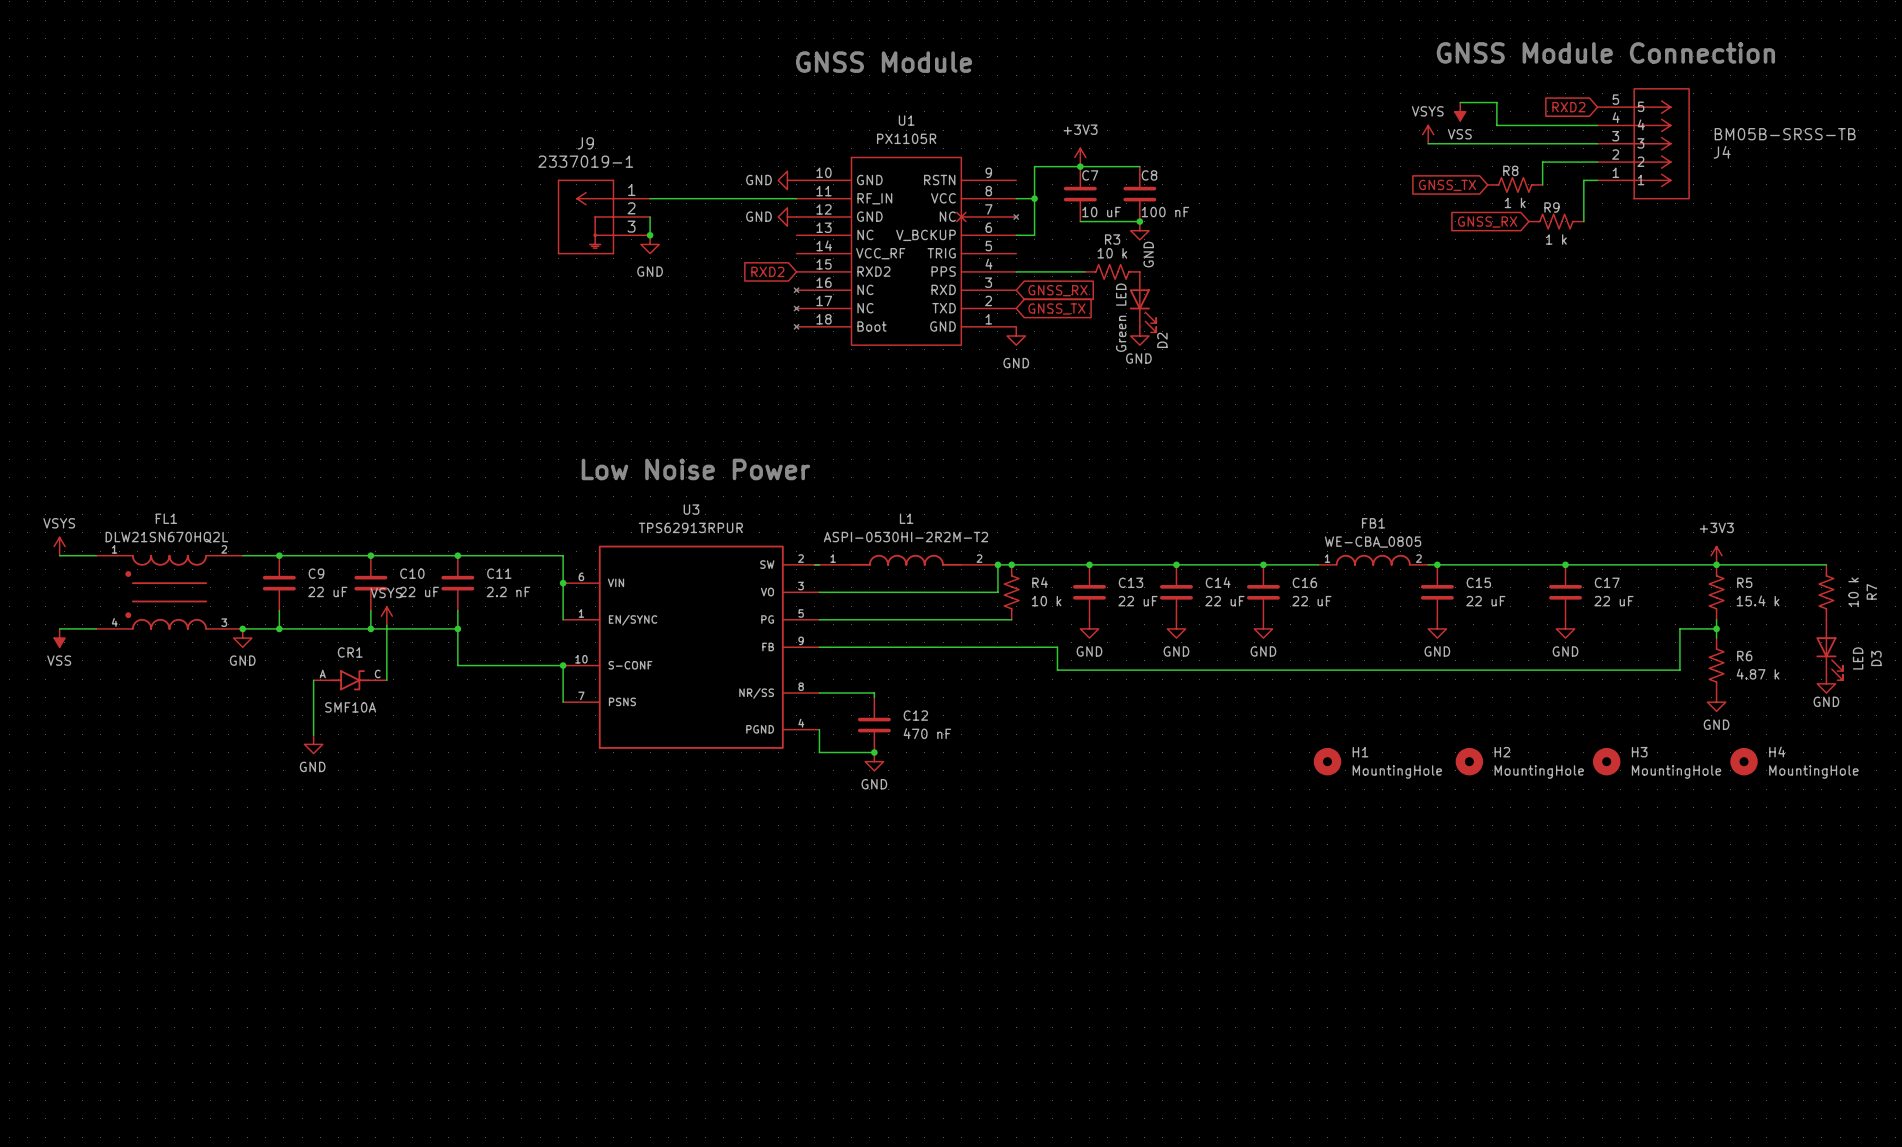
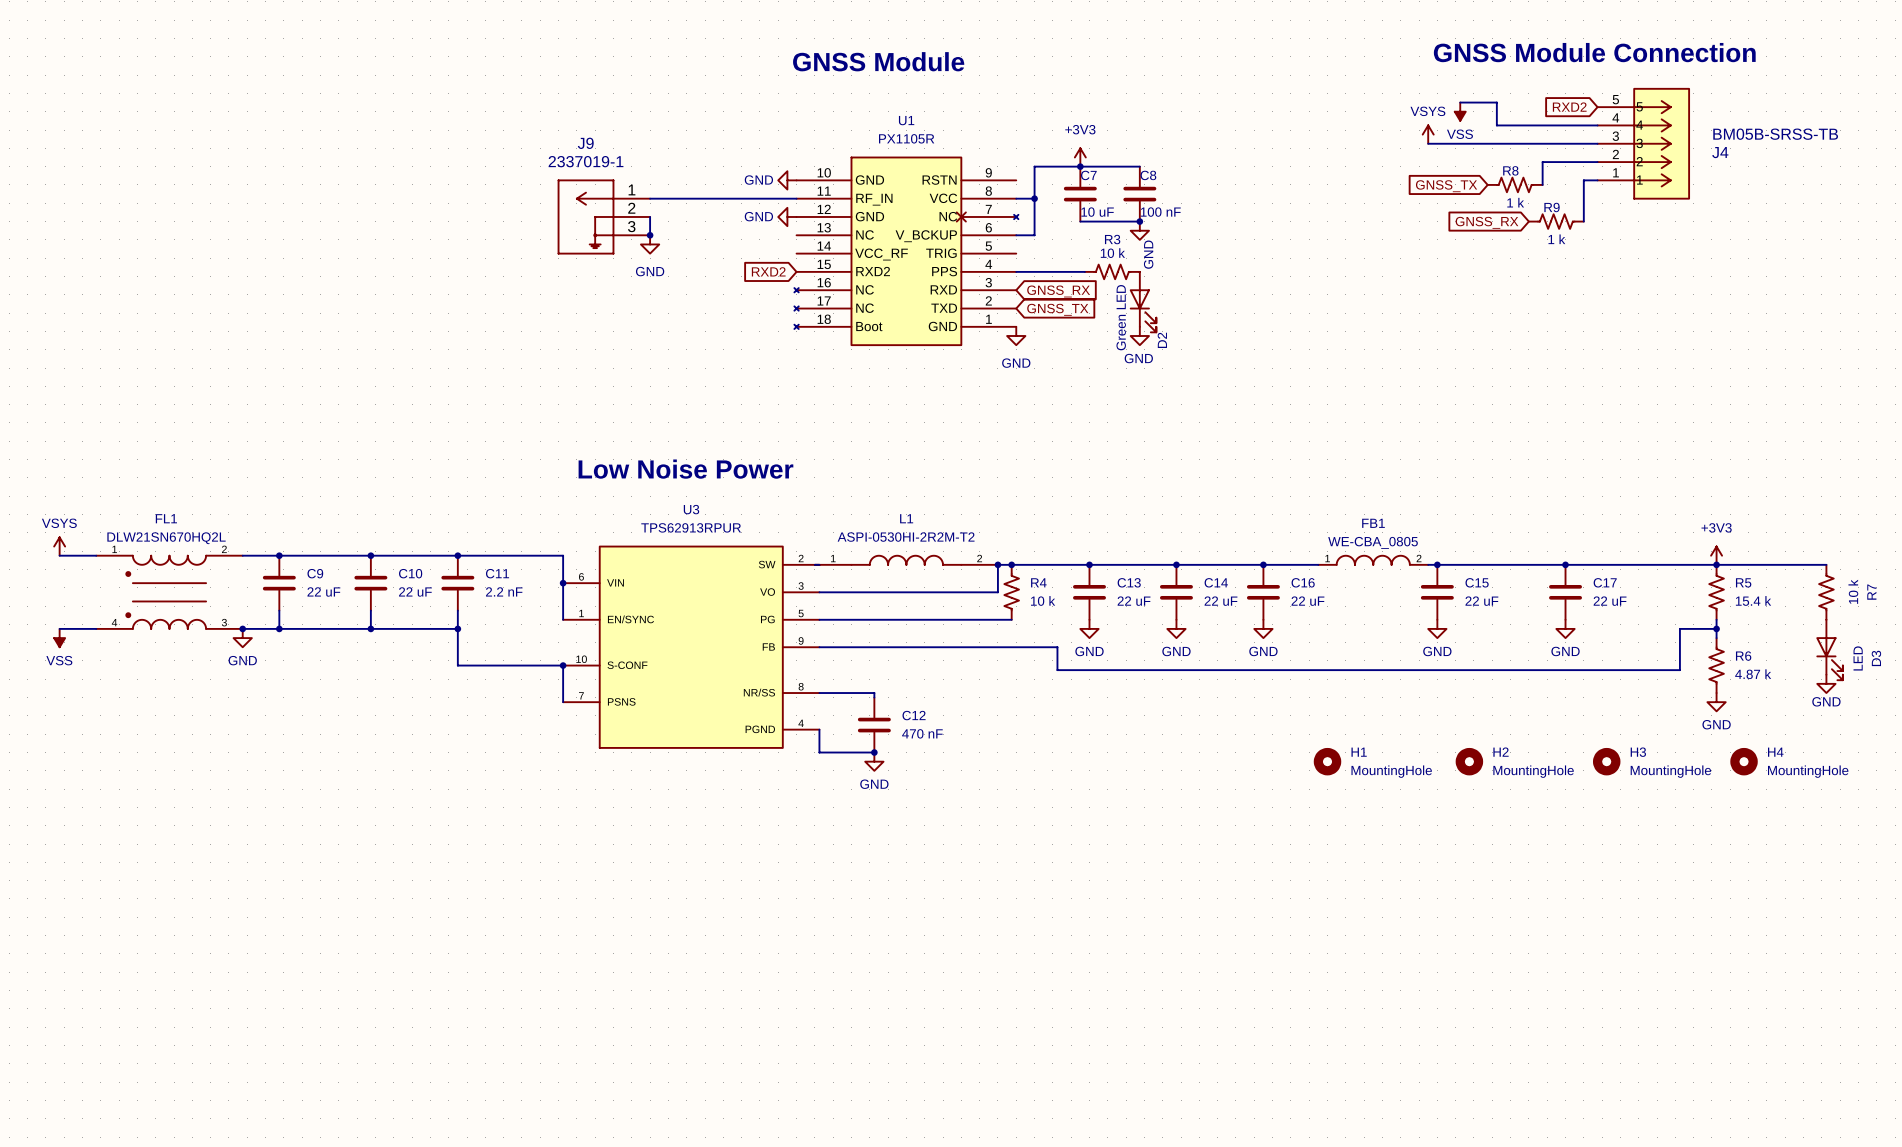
power symbol: VSYS (386, 616) -> none
wire: (386, 625) (386, 680) -> none
wire: (313, 680) (313, 735) -> none
CR1: SMF10A (350, 680) -> none
power symbol: GND (313, 744) -> none

